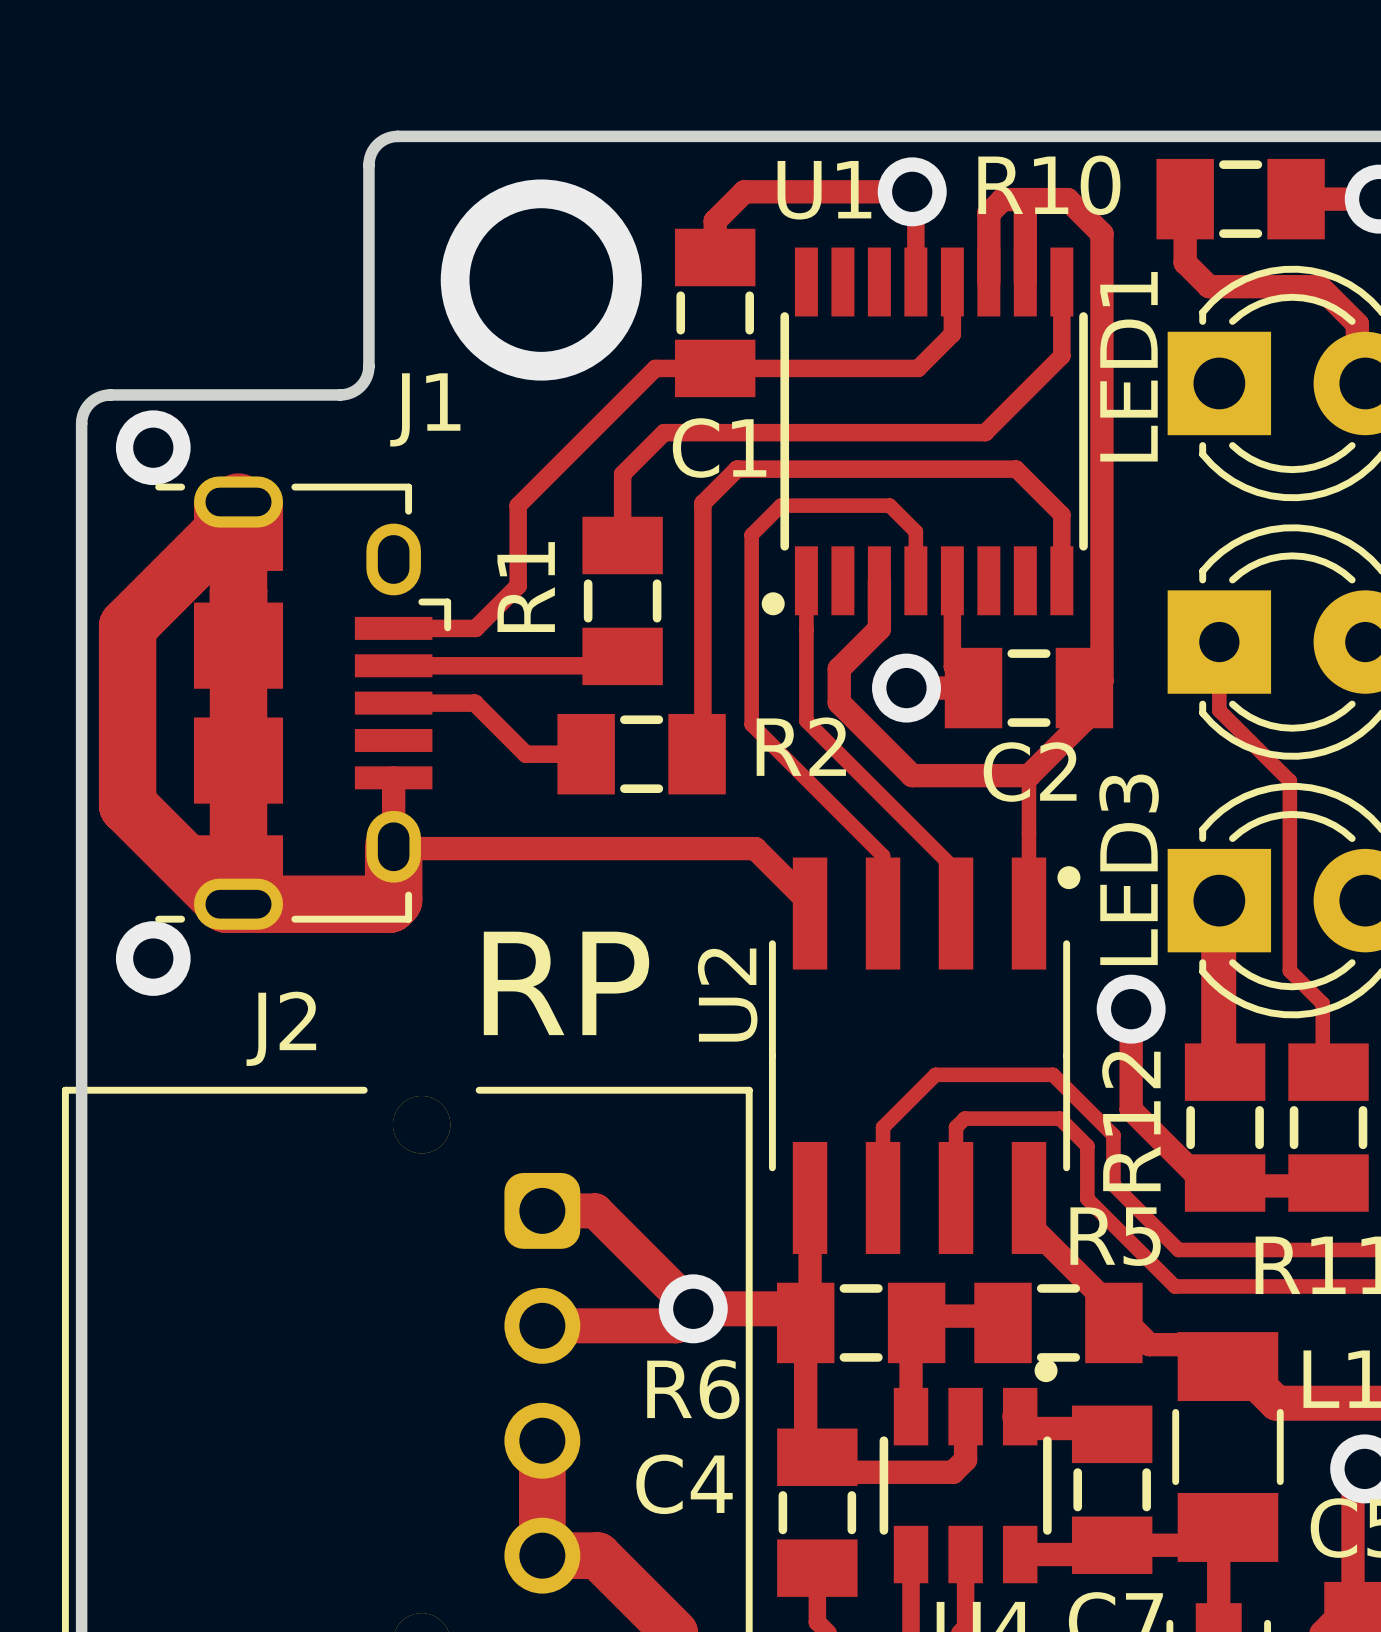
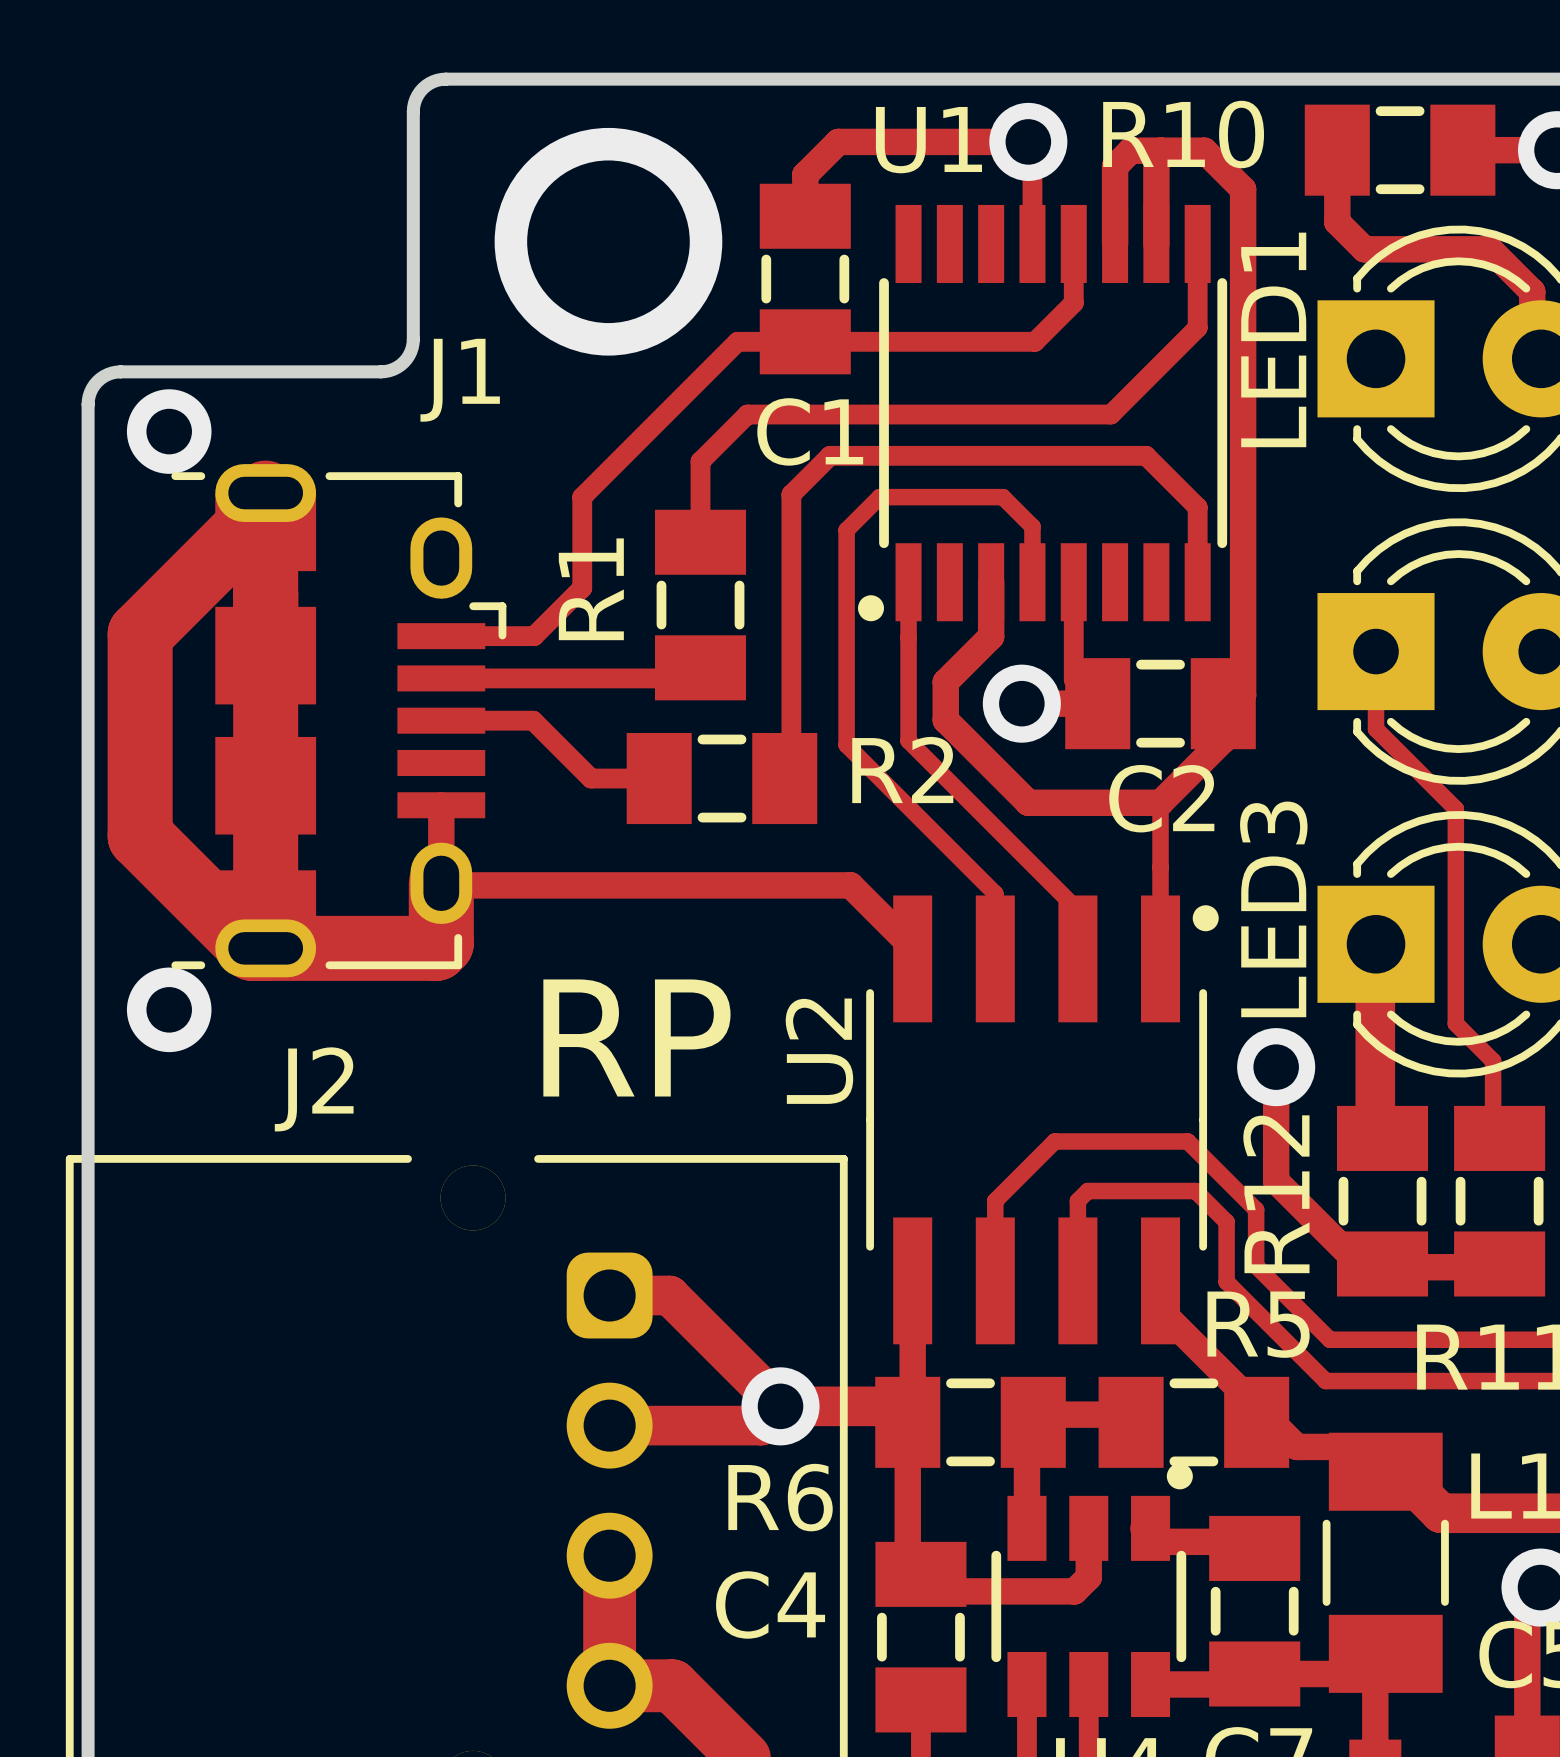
J1 name position: J1 (425, 409) -> J1 (460, 380)

